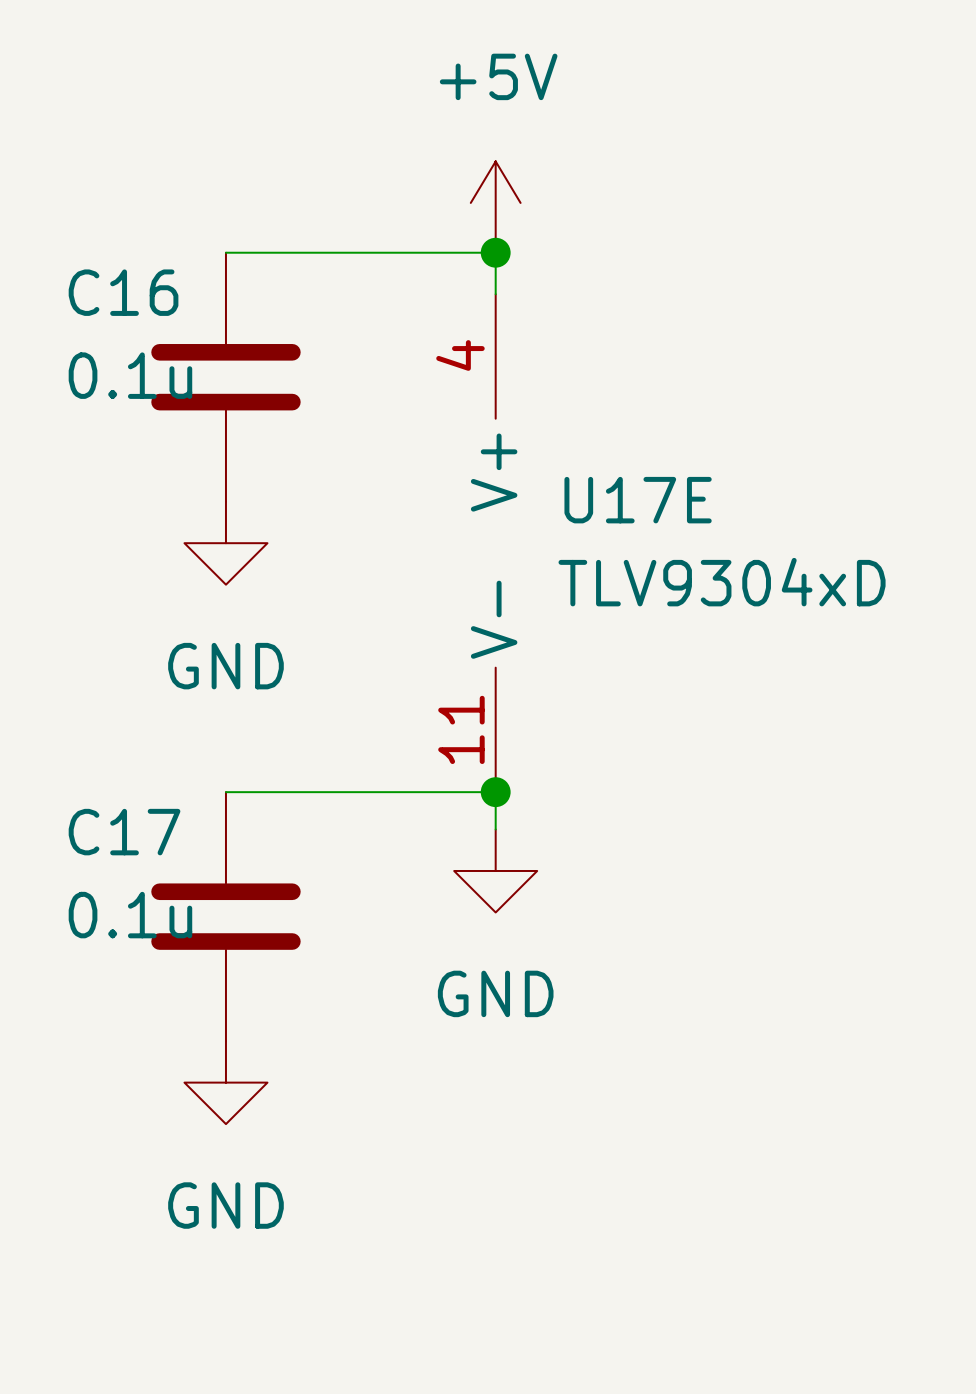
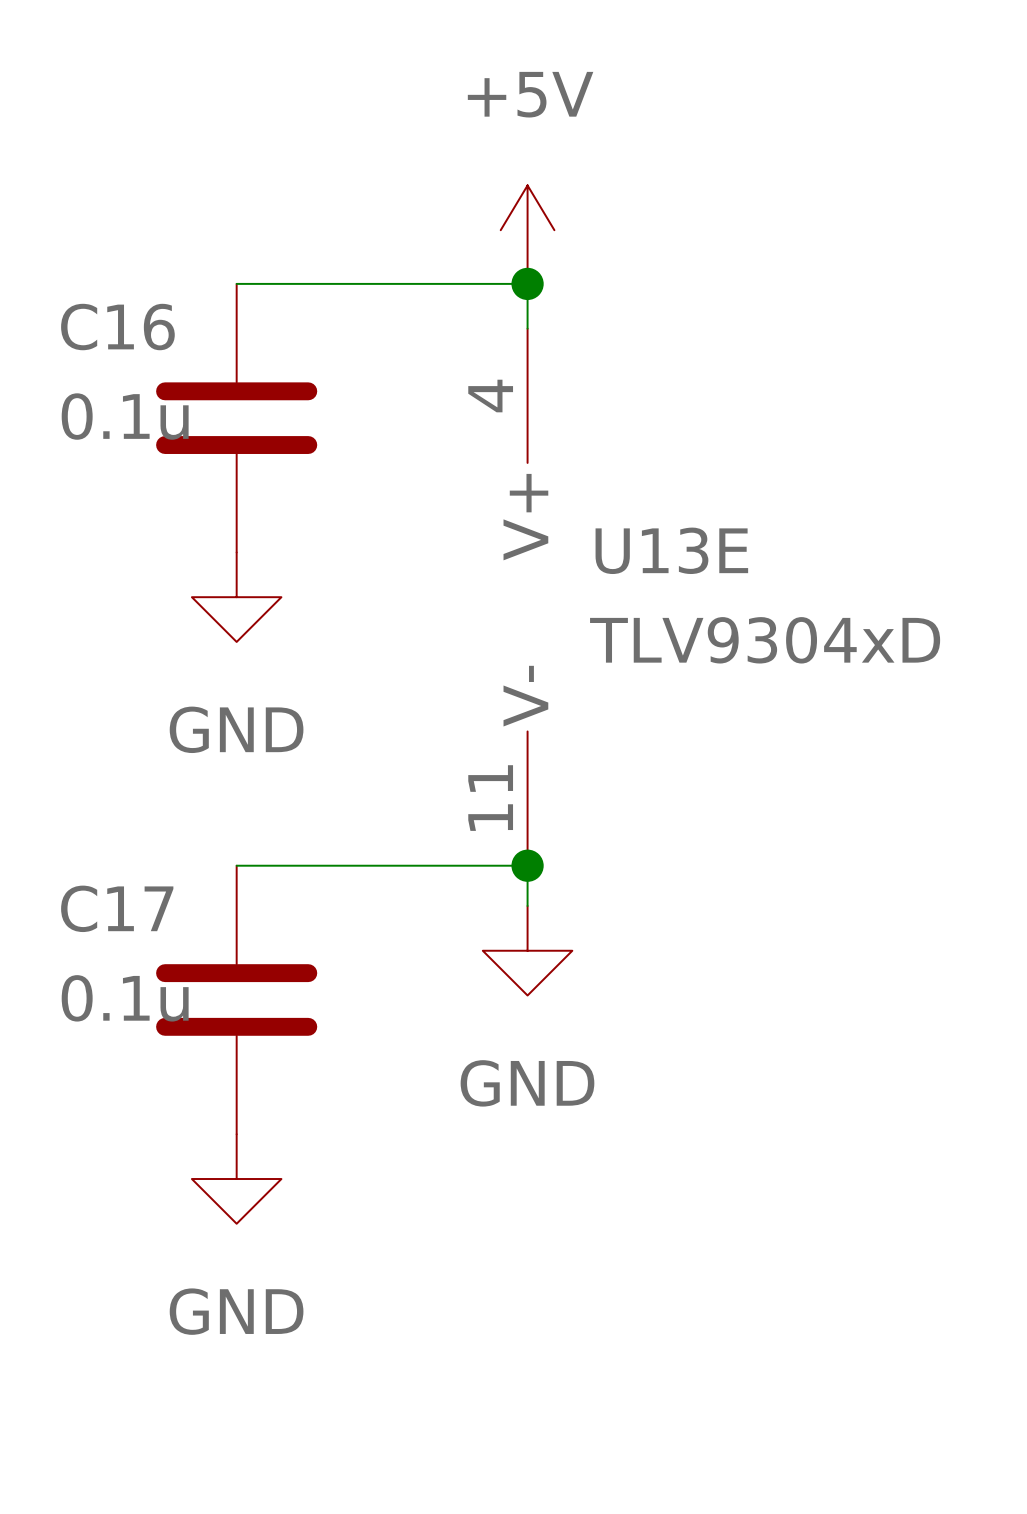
U17E name: U17E (638, 500) -> U13E (671, 550)

